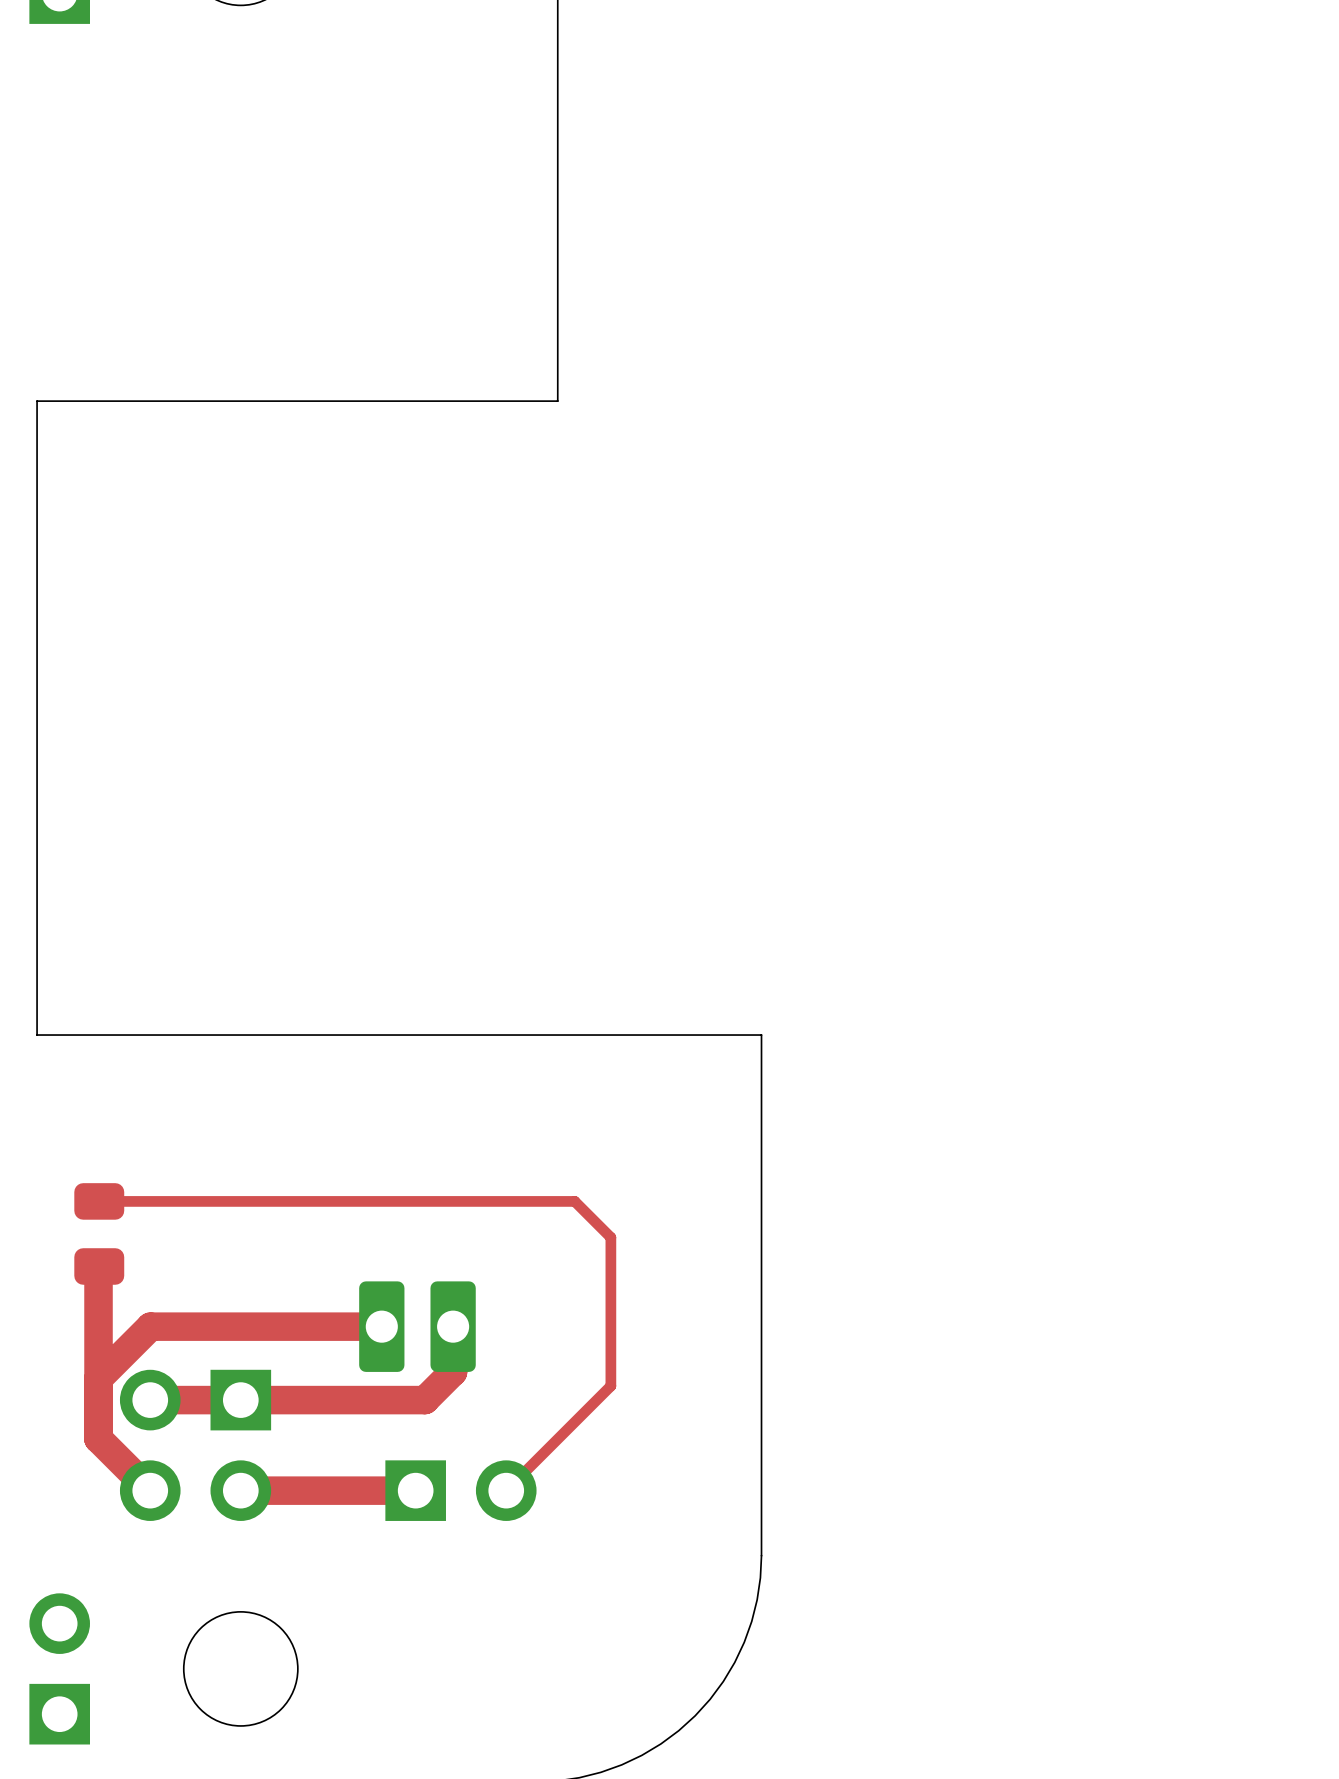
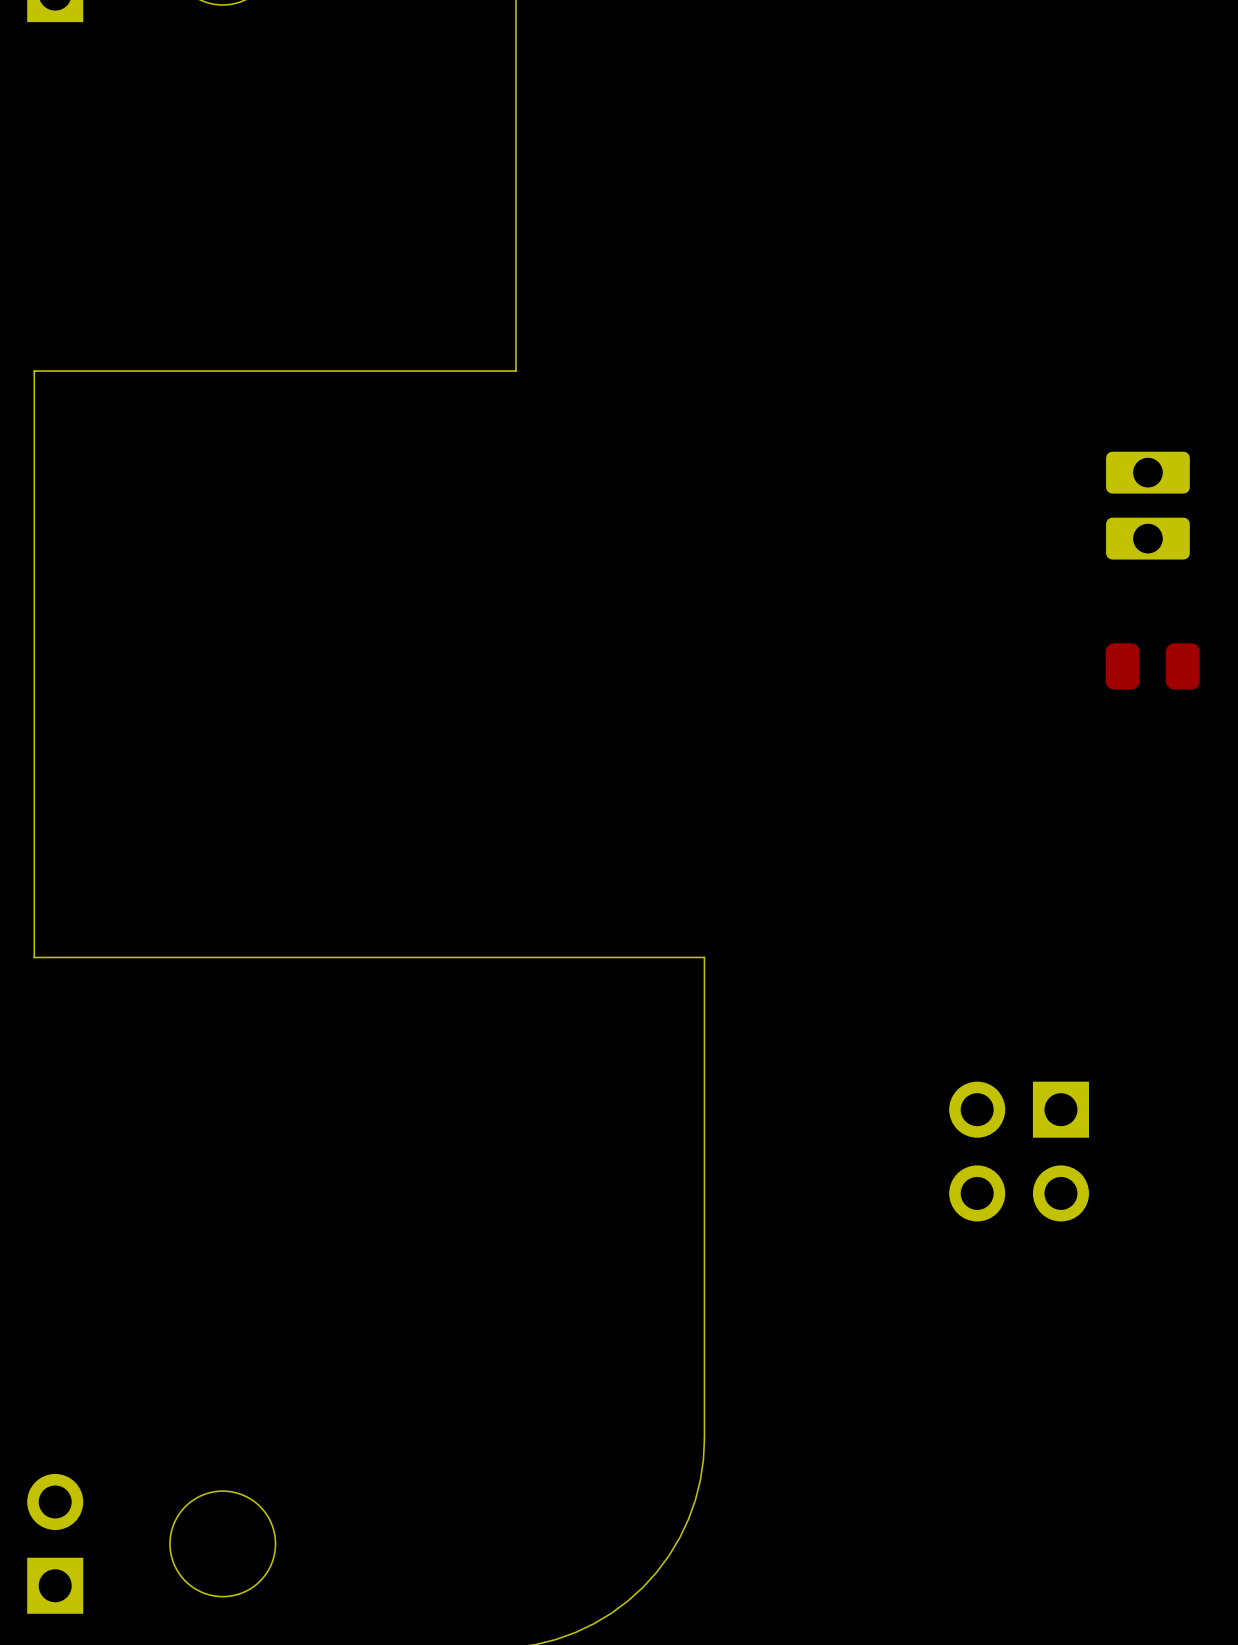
part: none -> (1147, 505)
part: none -> (1152, 666)
top track: (99, 1201) (574, 1201) (610, 1237) (610, 1386) (506, 1490) -> none
part: (99, 1233) -> none
part: none -> (1019, 1151)
top track: (99, 1266) (98, 1438) (150, 1490) -> none
top track: (381, 1326) (150, 1326) (98, 1378) -> none
part: (417, 1326) -> none
top track: (453, 1326) (453, 1371) (424, 1400) (150, 1400) -> none
part: (195, 1445) -> none
top track: (415, 1490) (240, 1490) -> none
part: (460, 1490) -> none

